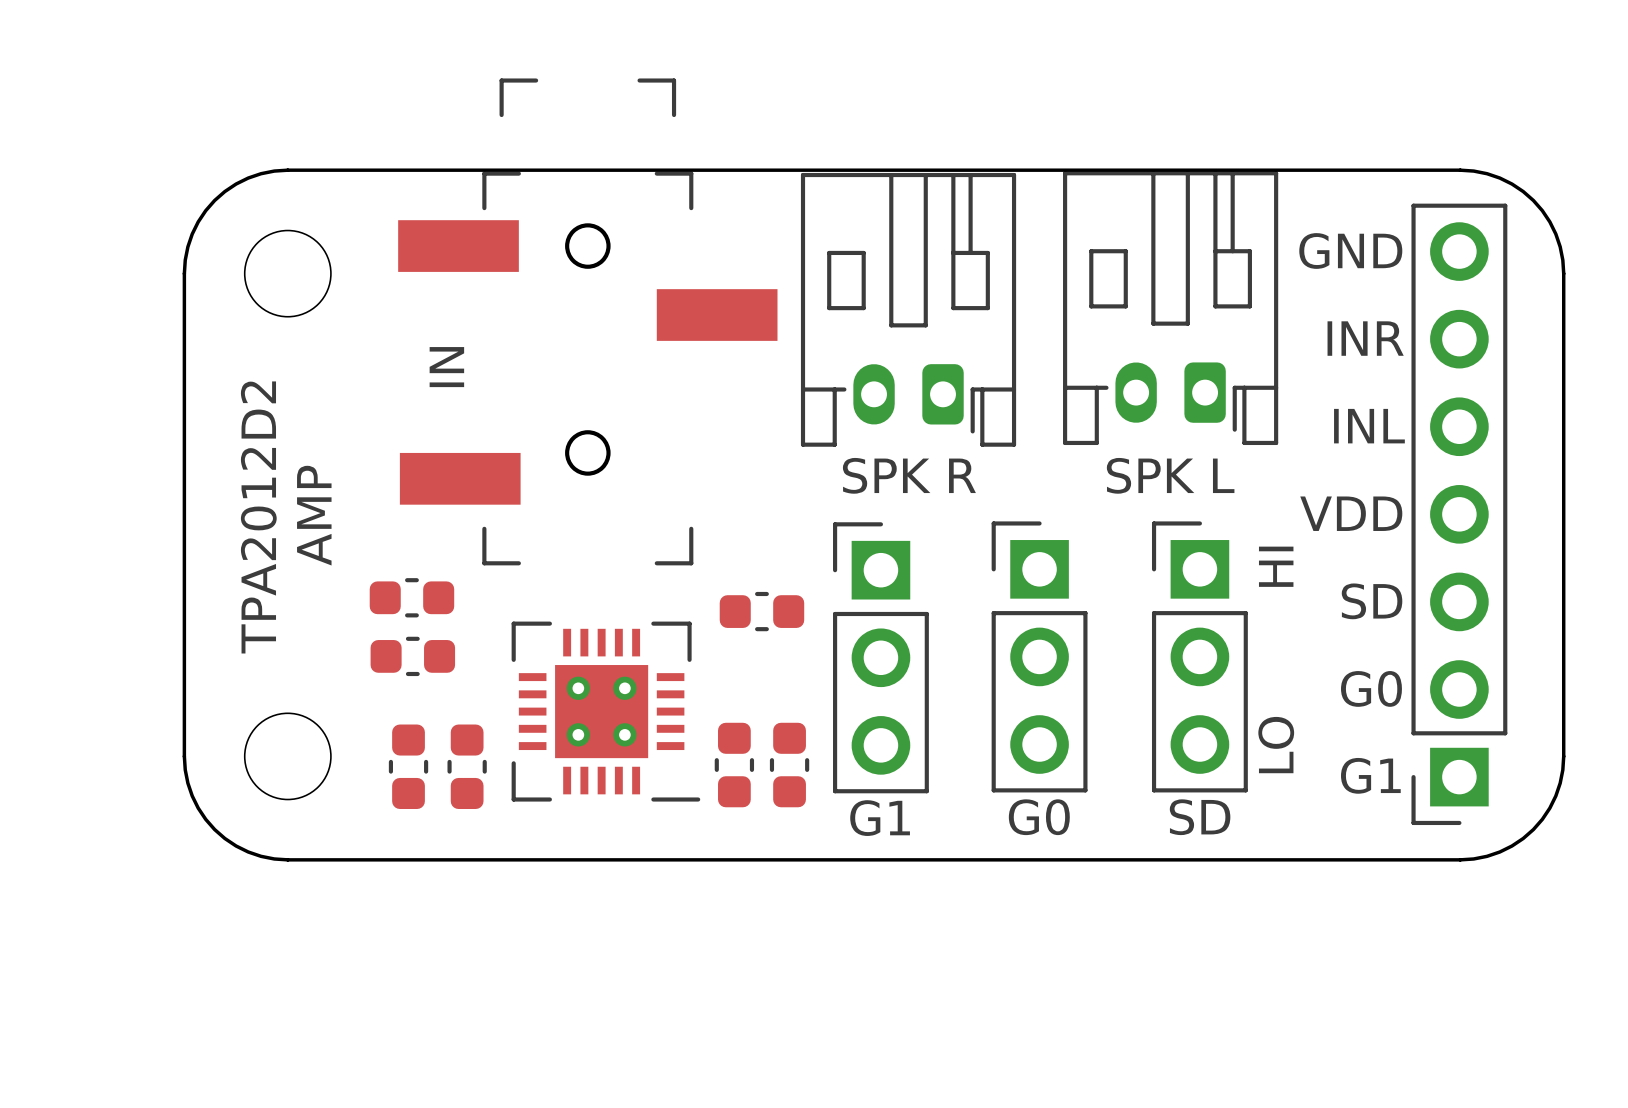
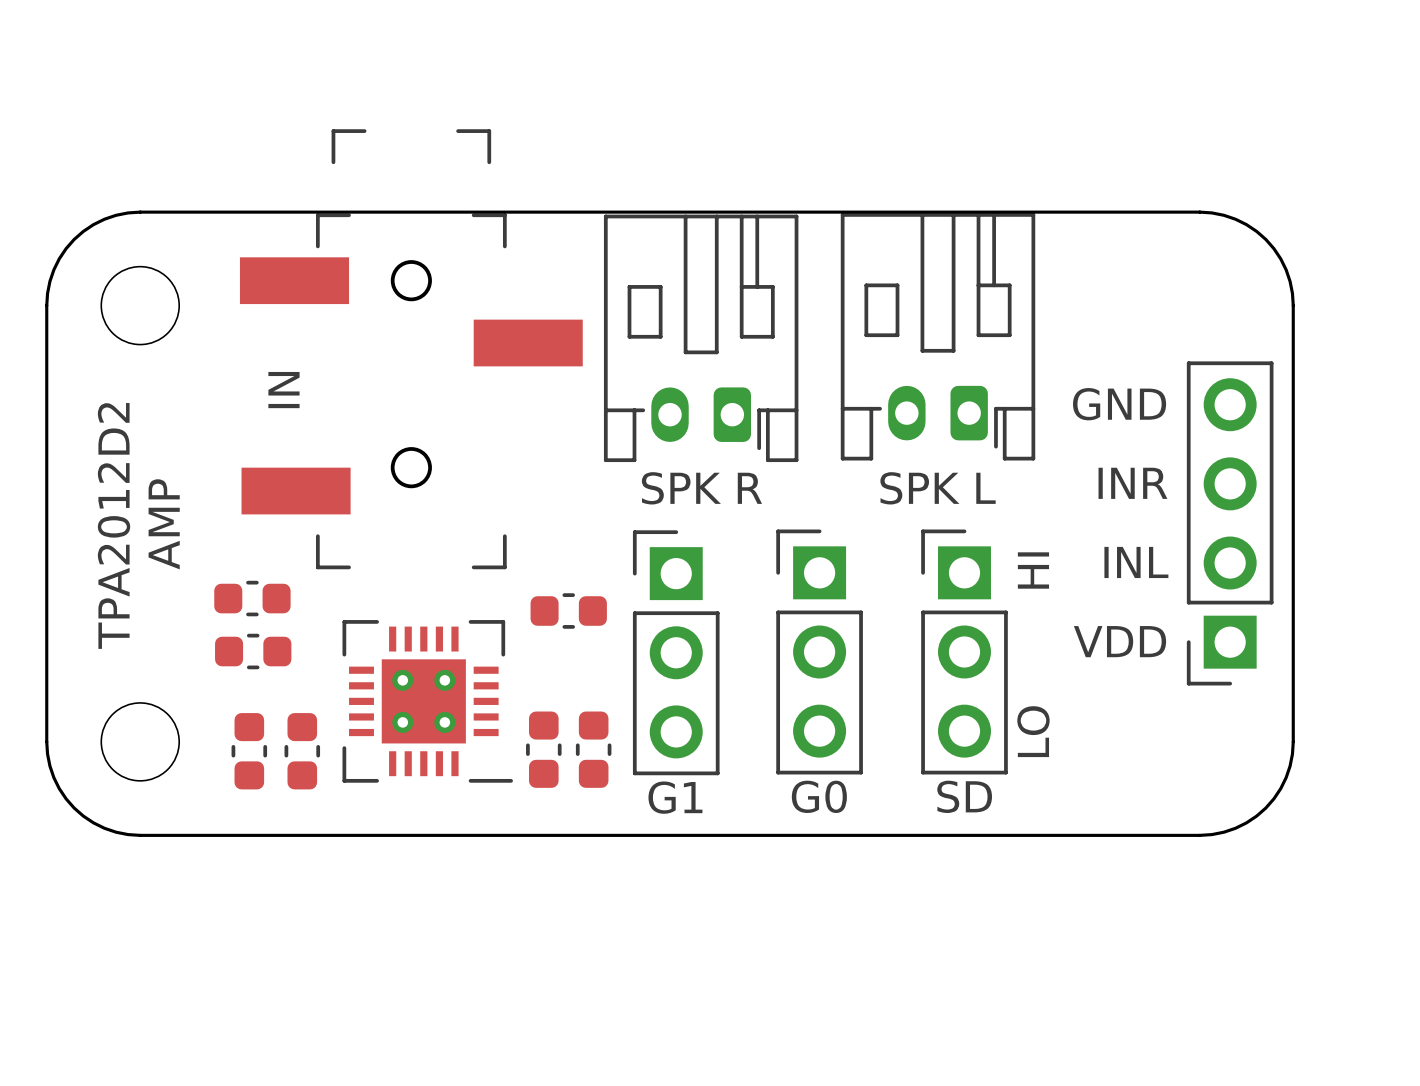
text position: GND (1350, 250) -> GND (1119, 404)
text position: INR (1365, 338) -> INR (1132, 483)
text position: INL (1369, 426) -> INL (1136, 562)
text position: VDD (1351, 513) -> VDD (1119, 641)
part: (1459, 514) -> none
part: none -> (1230, 523)
text: SD (1372, 601) -> none
text: G0 (1371, 688) -> none
text: G1 (1370, 775) -> none

